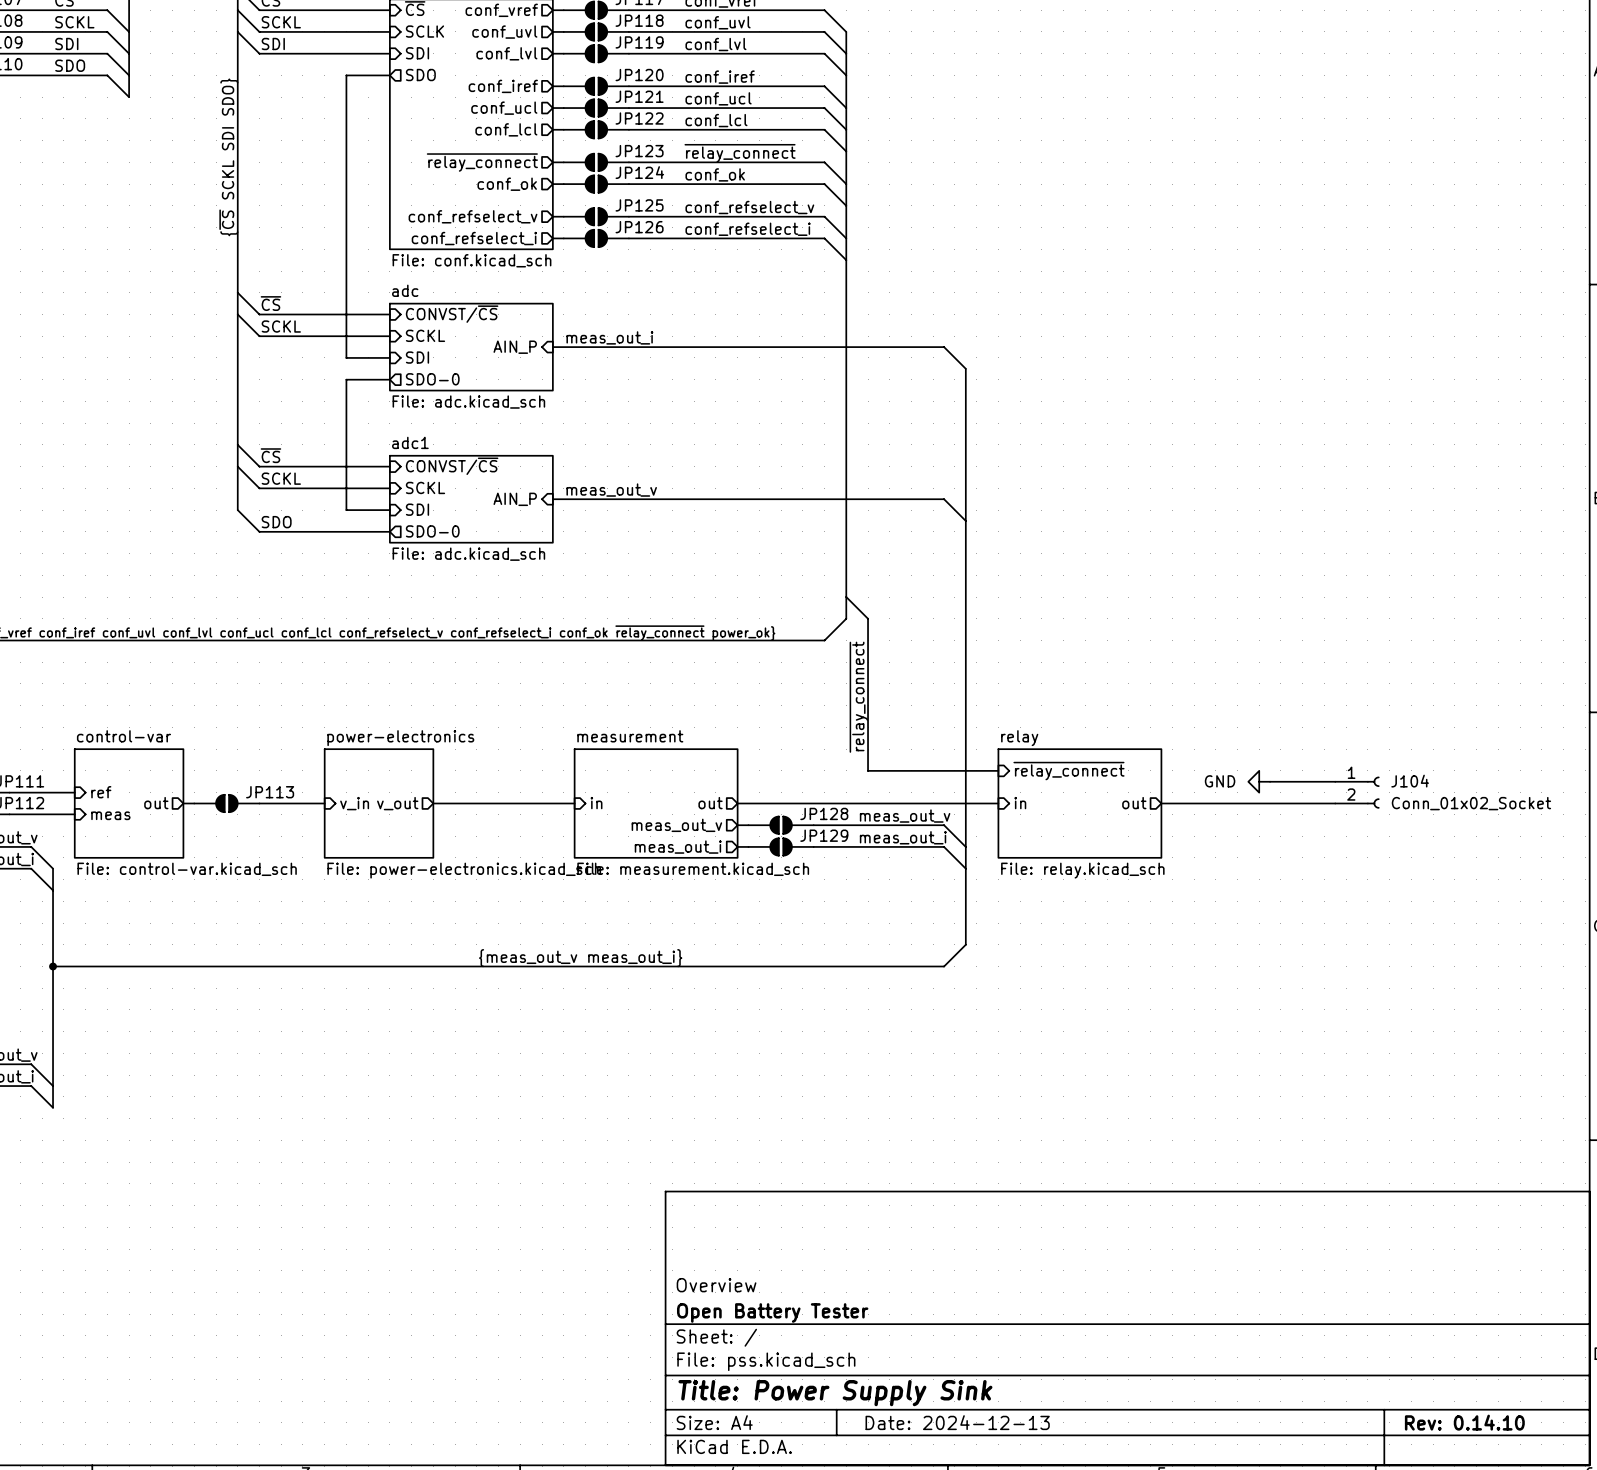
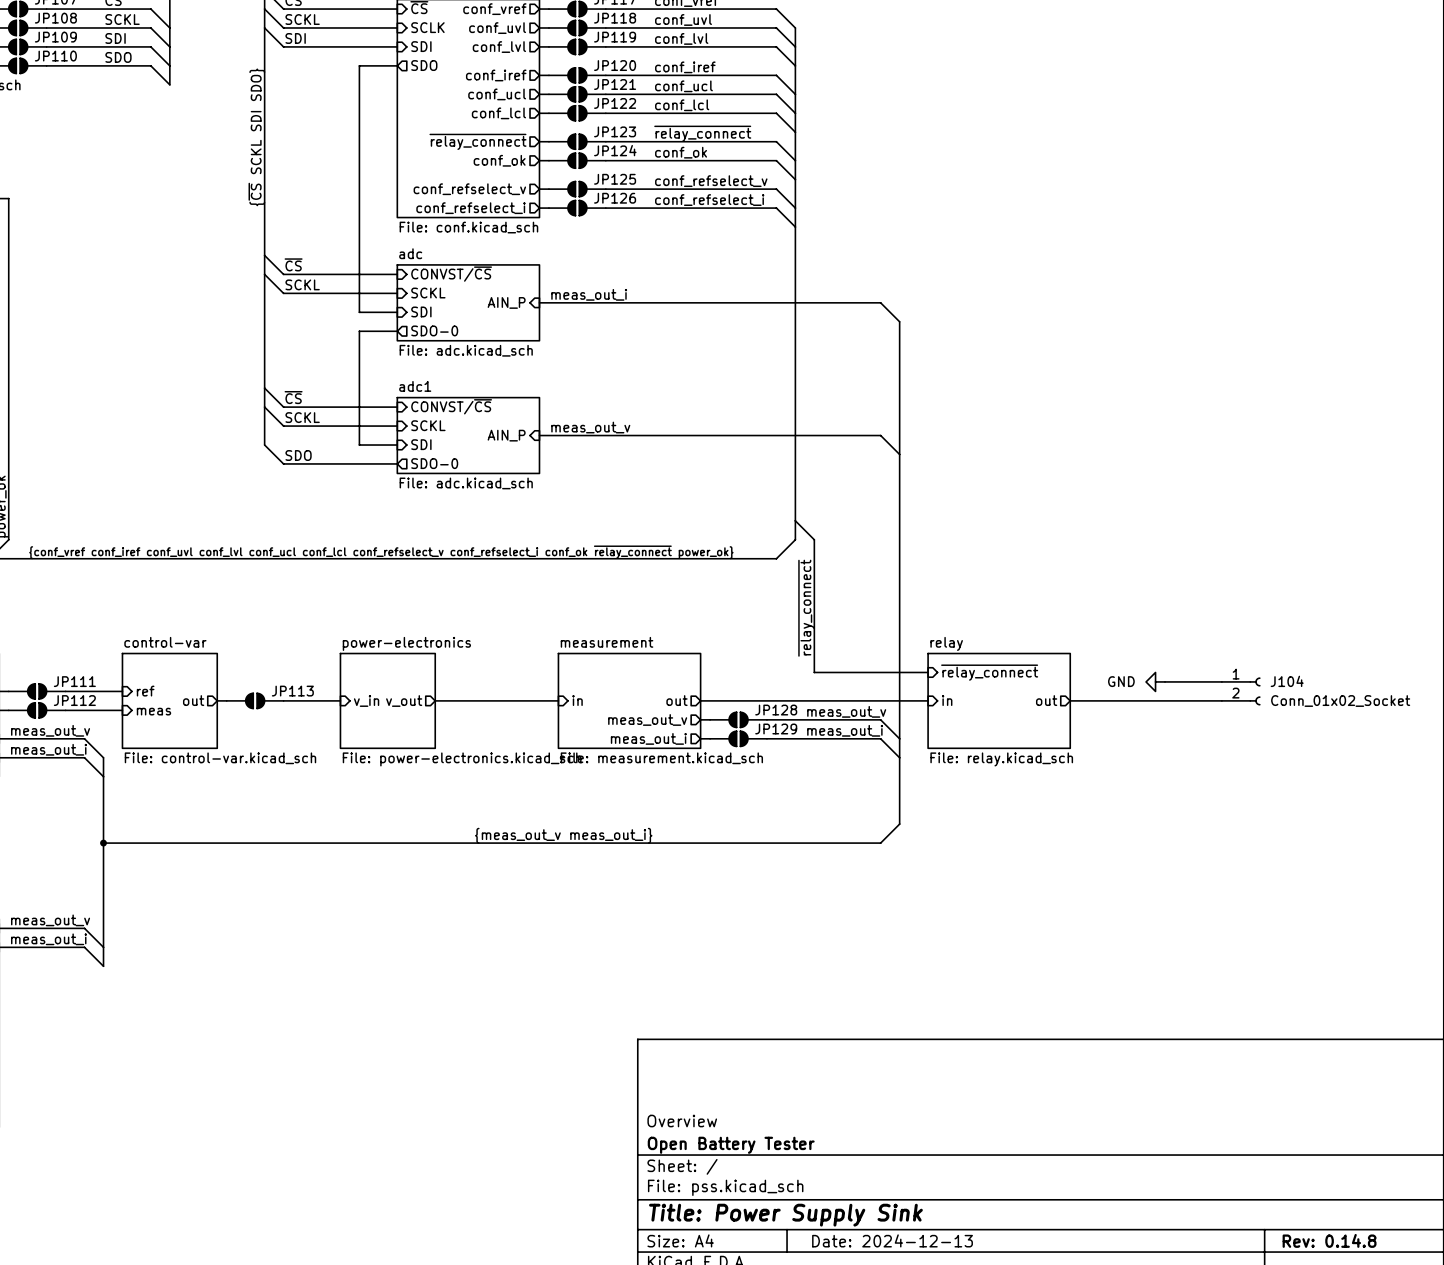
title block: Rev: 0.14.10 (1464, 1422) -> Rev: 0.14.8 (1329, 1240)

